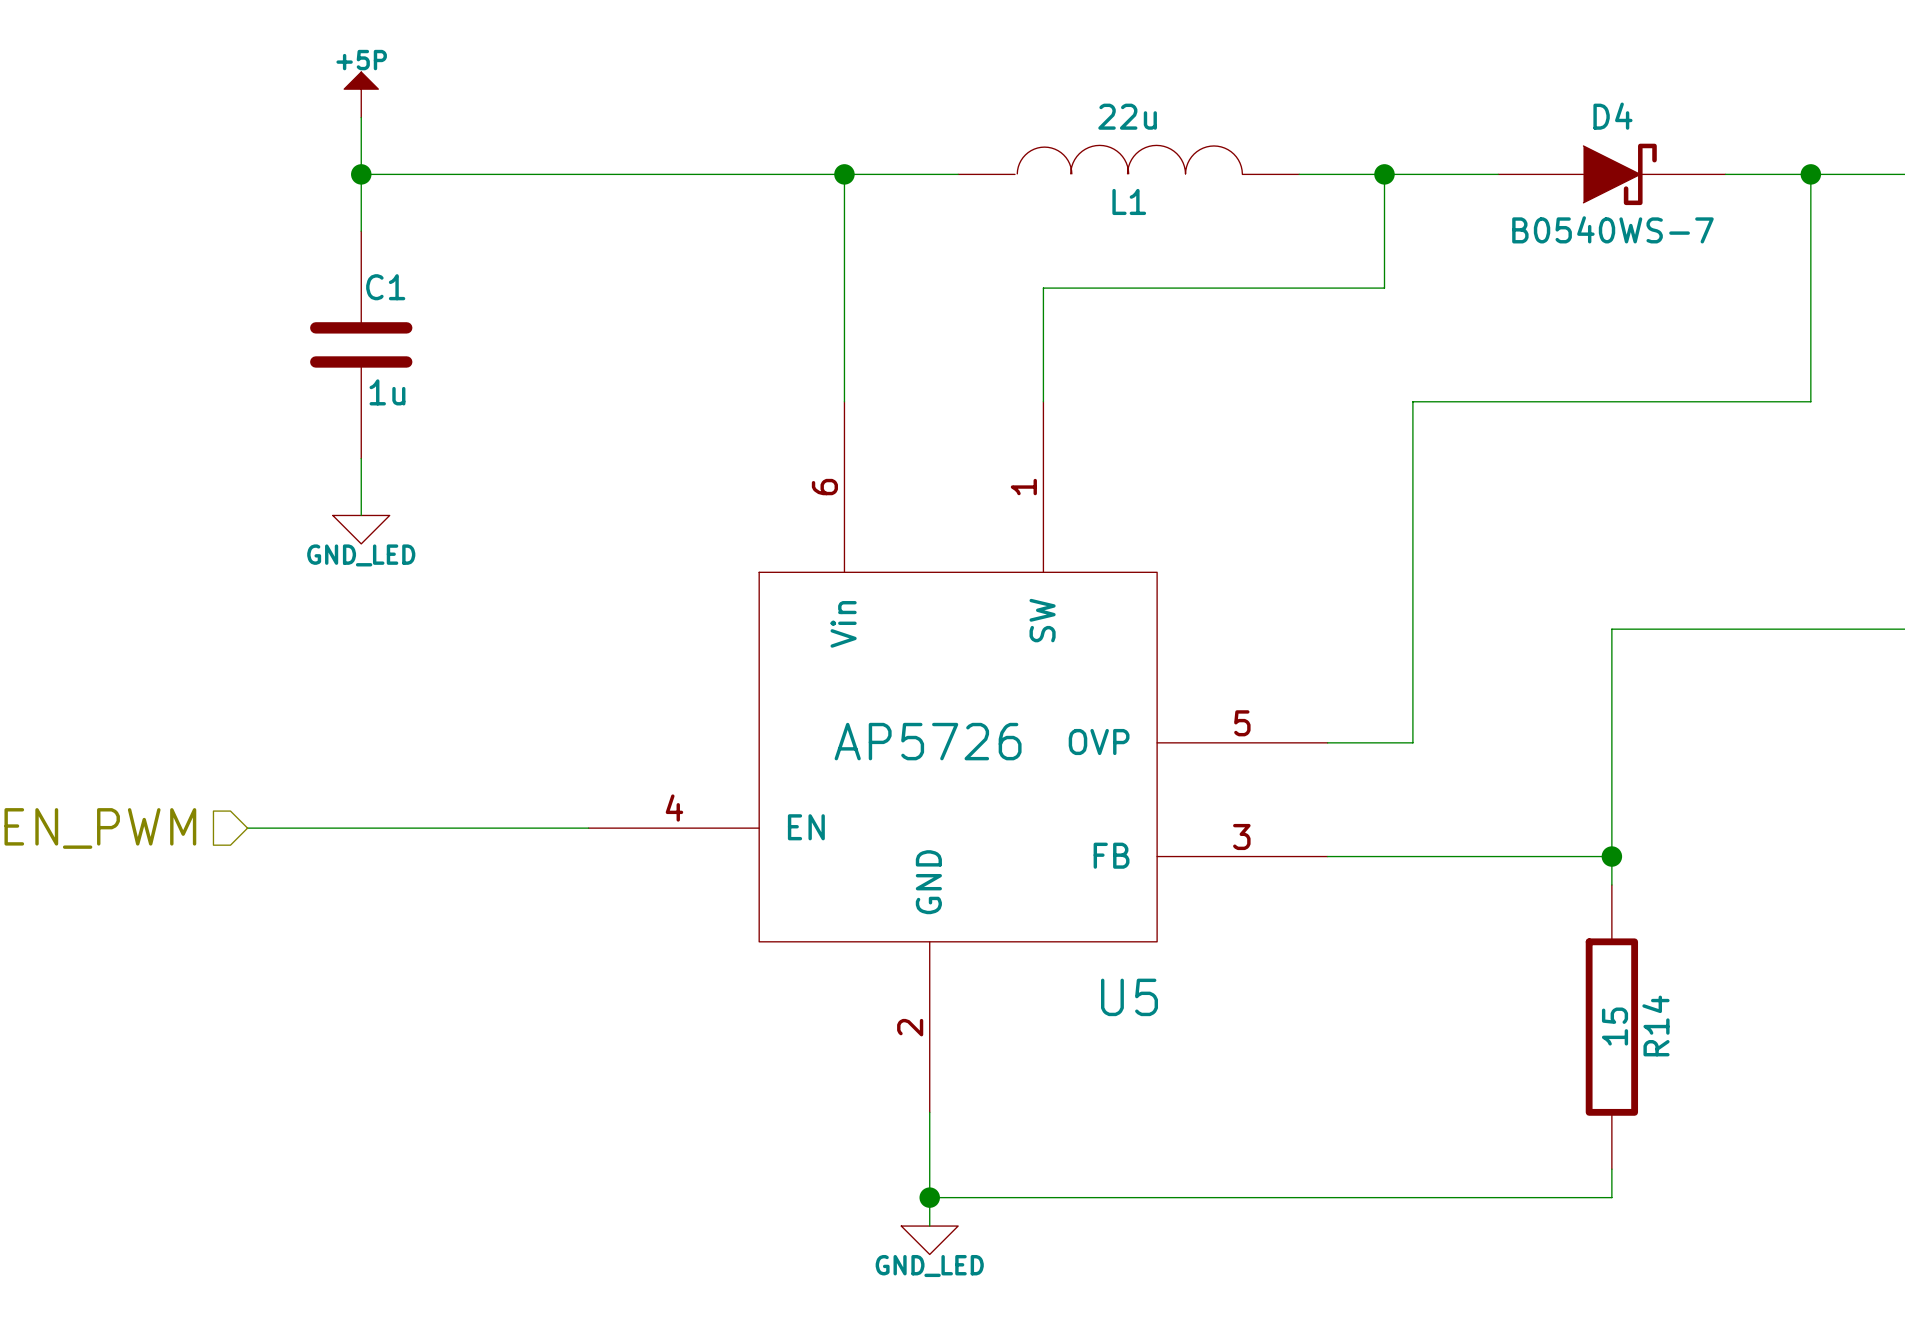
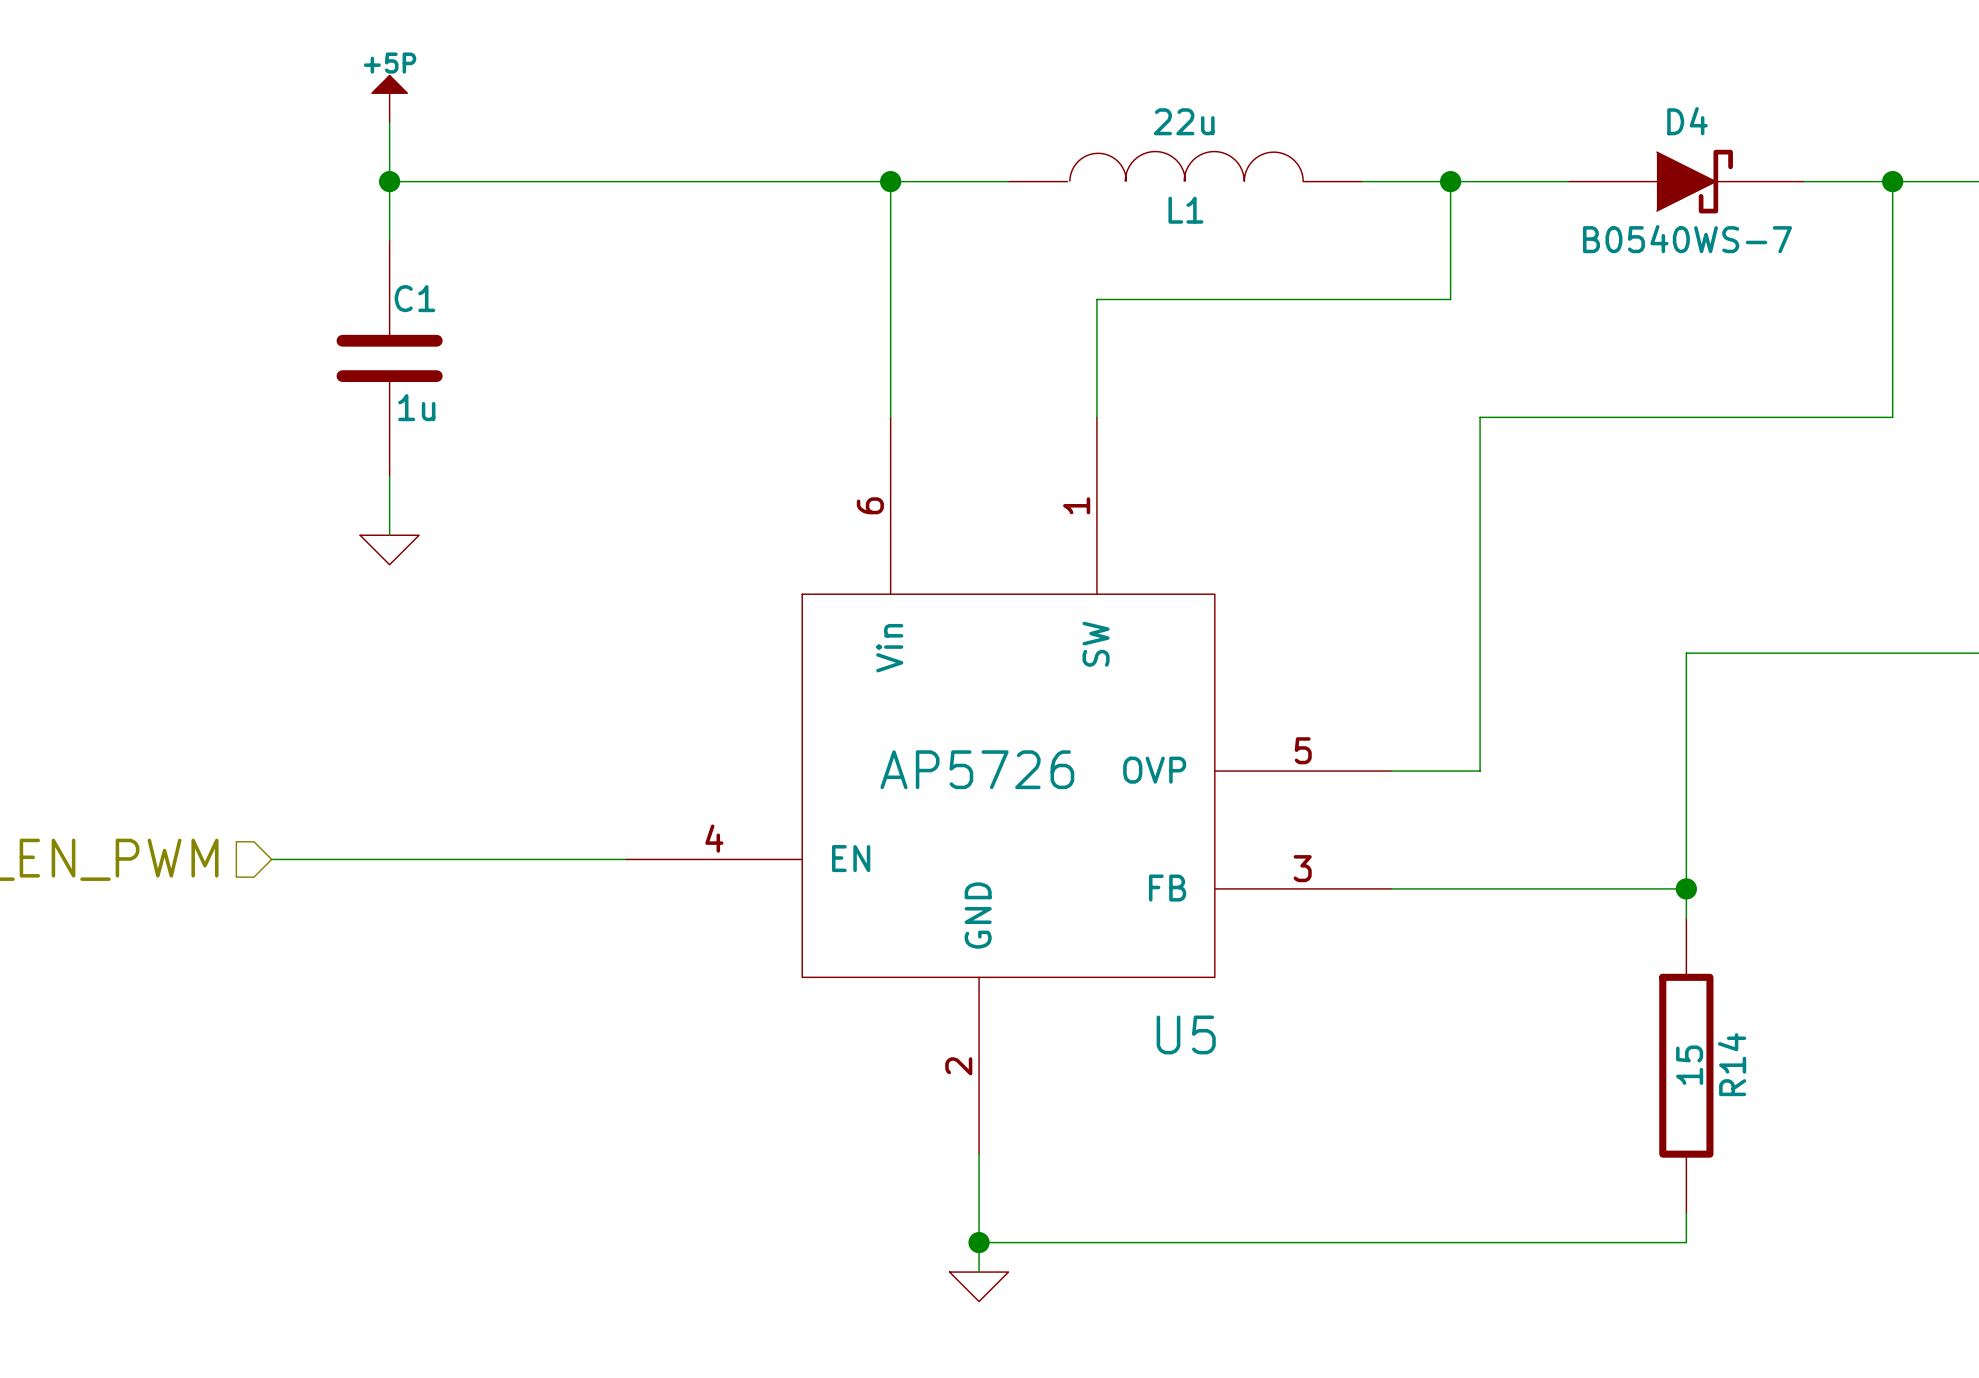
power symbol text: GND_LED (361, 555) -> none
power symbol text: GND_LED (929, 1266) -> none

